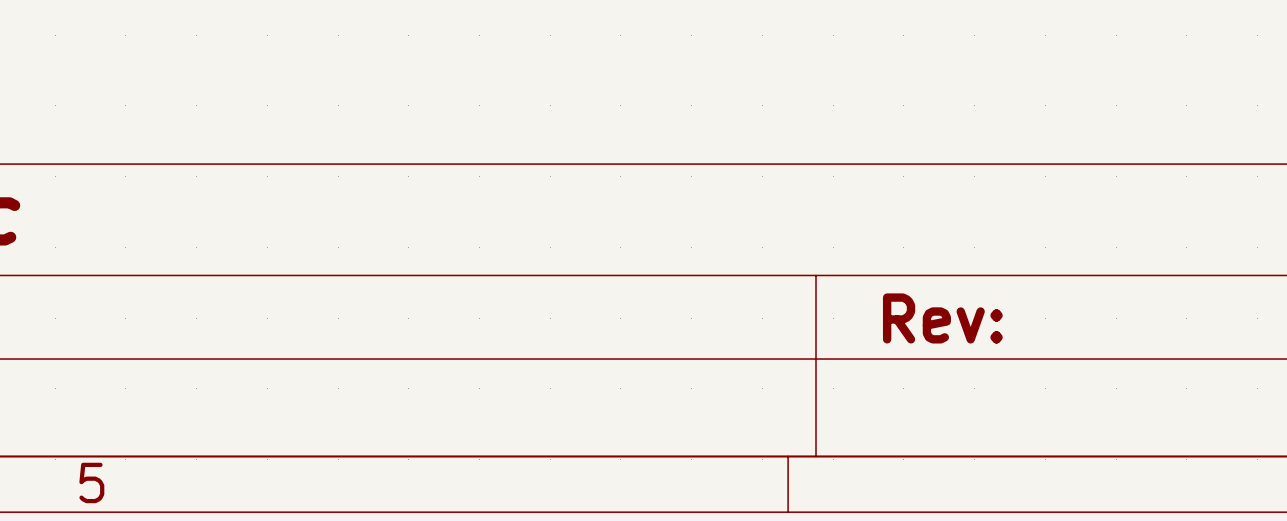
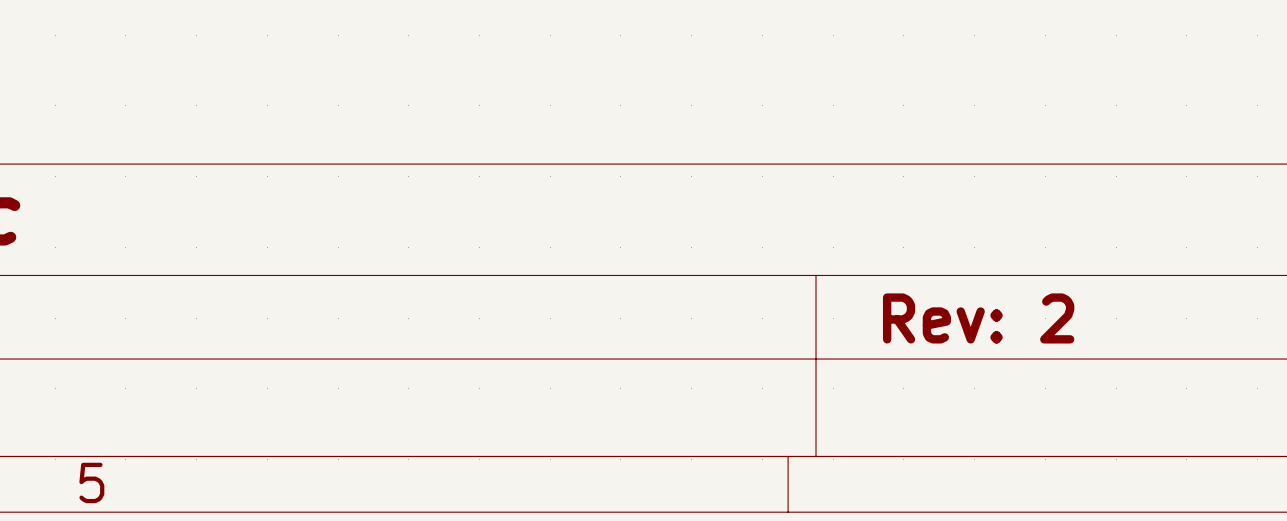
title block: Rev: (942, 318) -> Rev: 2 (978, 318)

